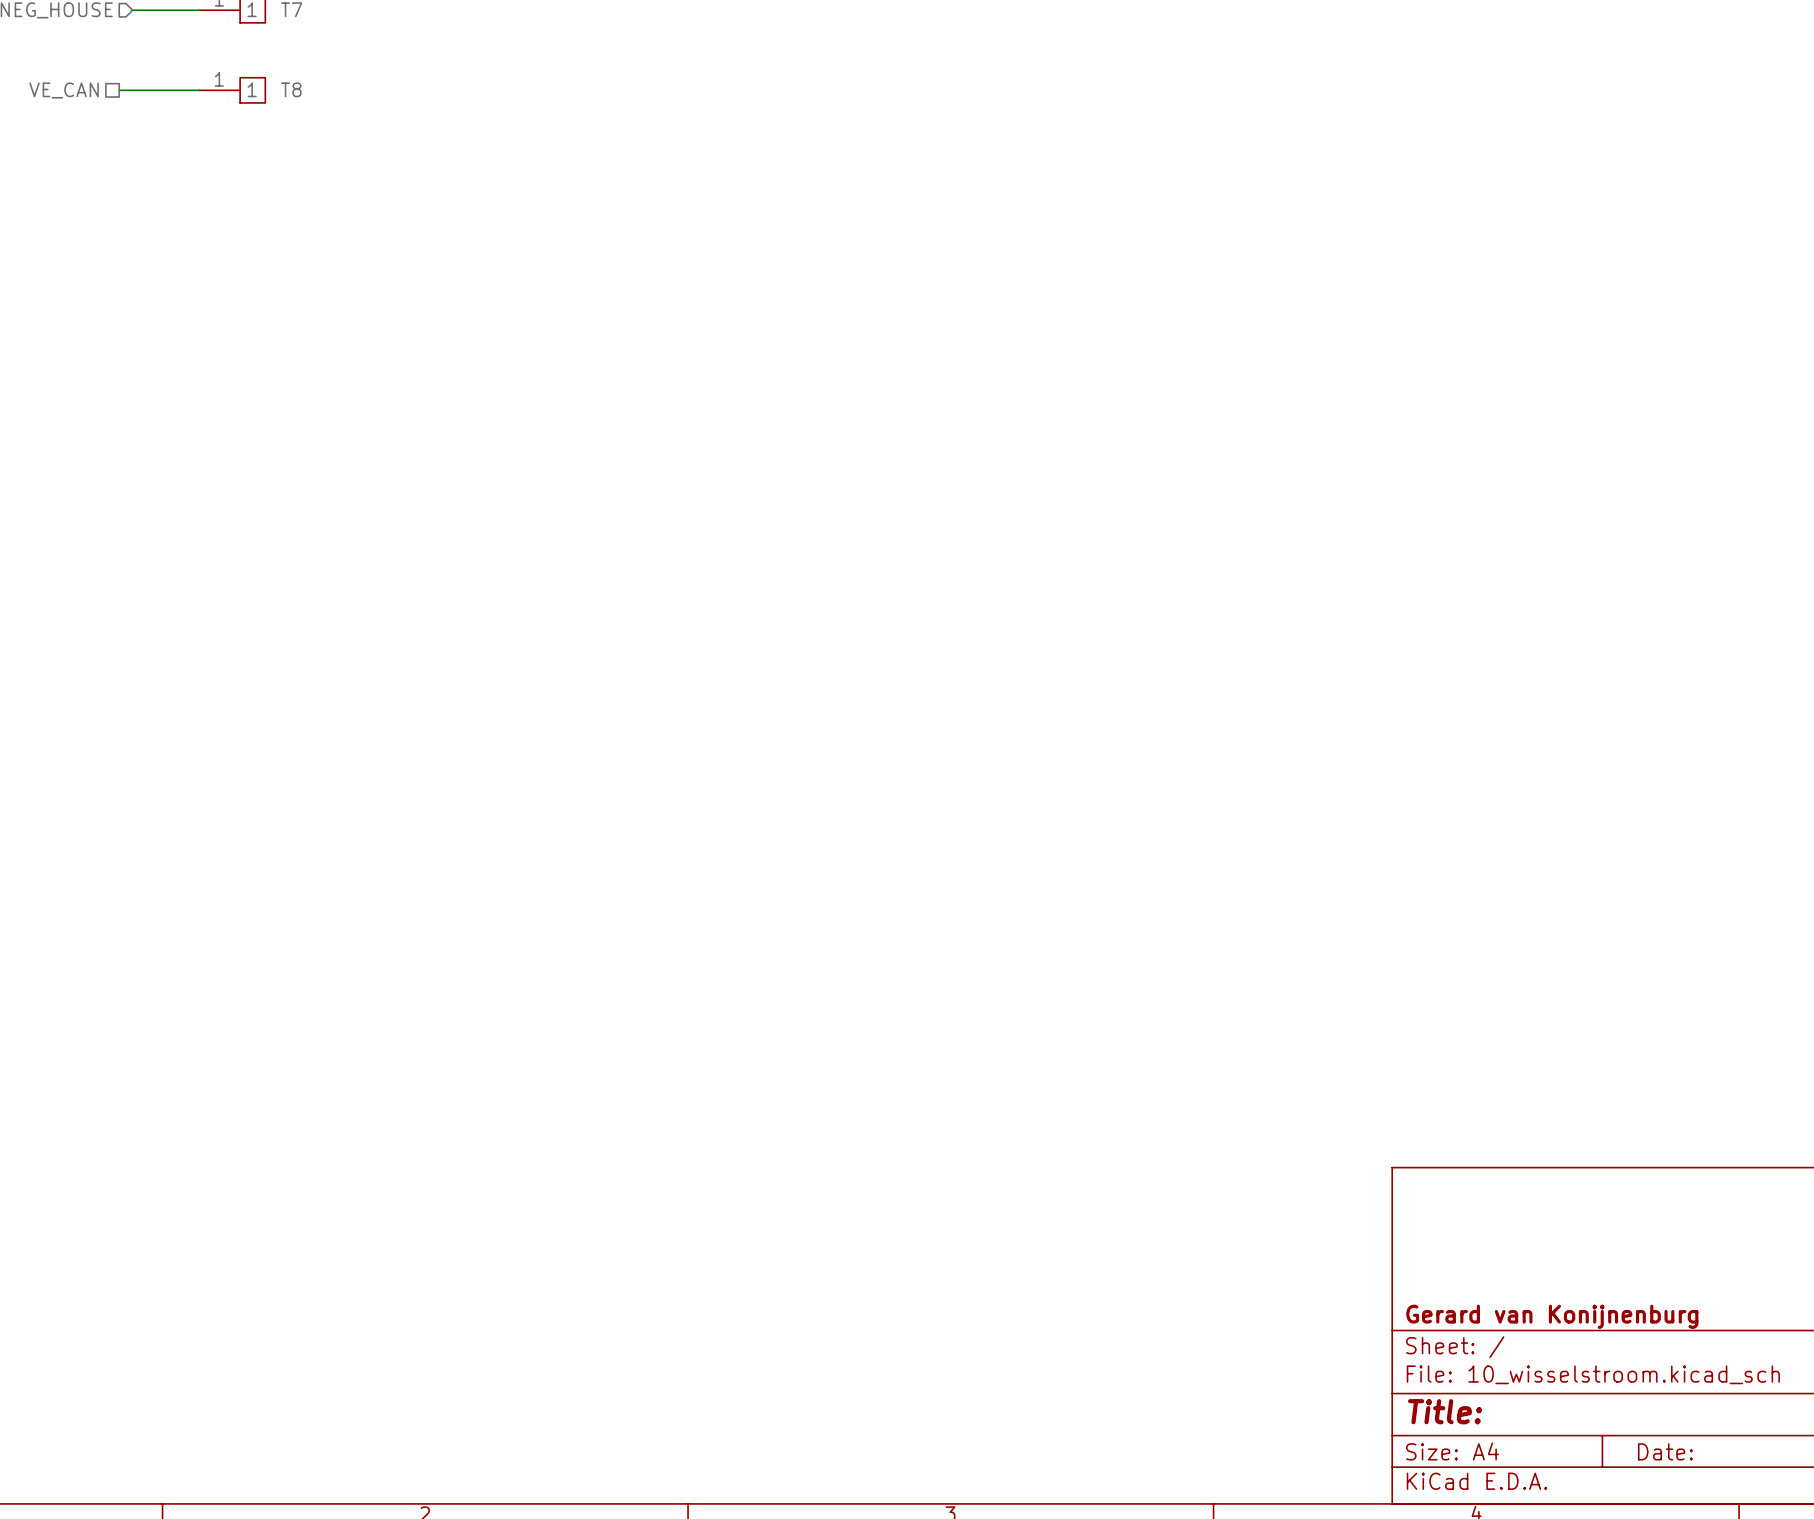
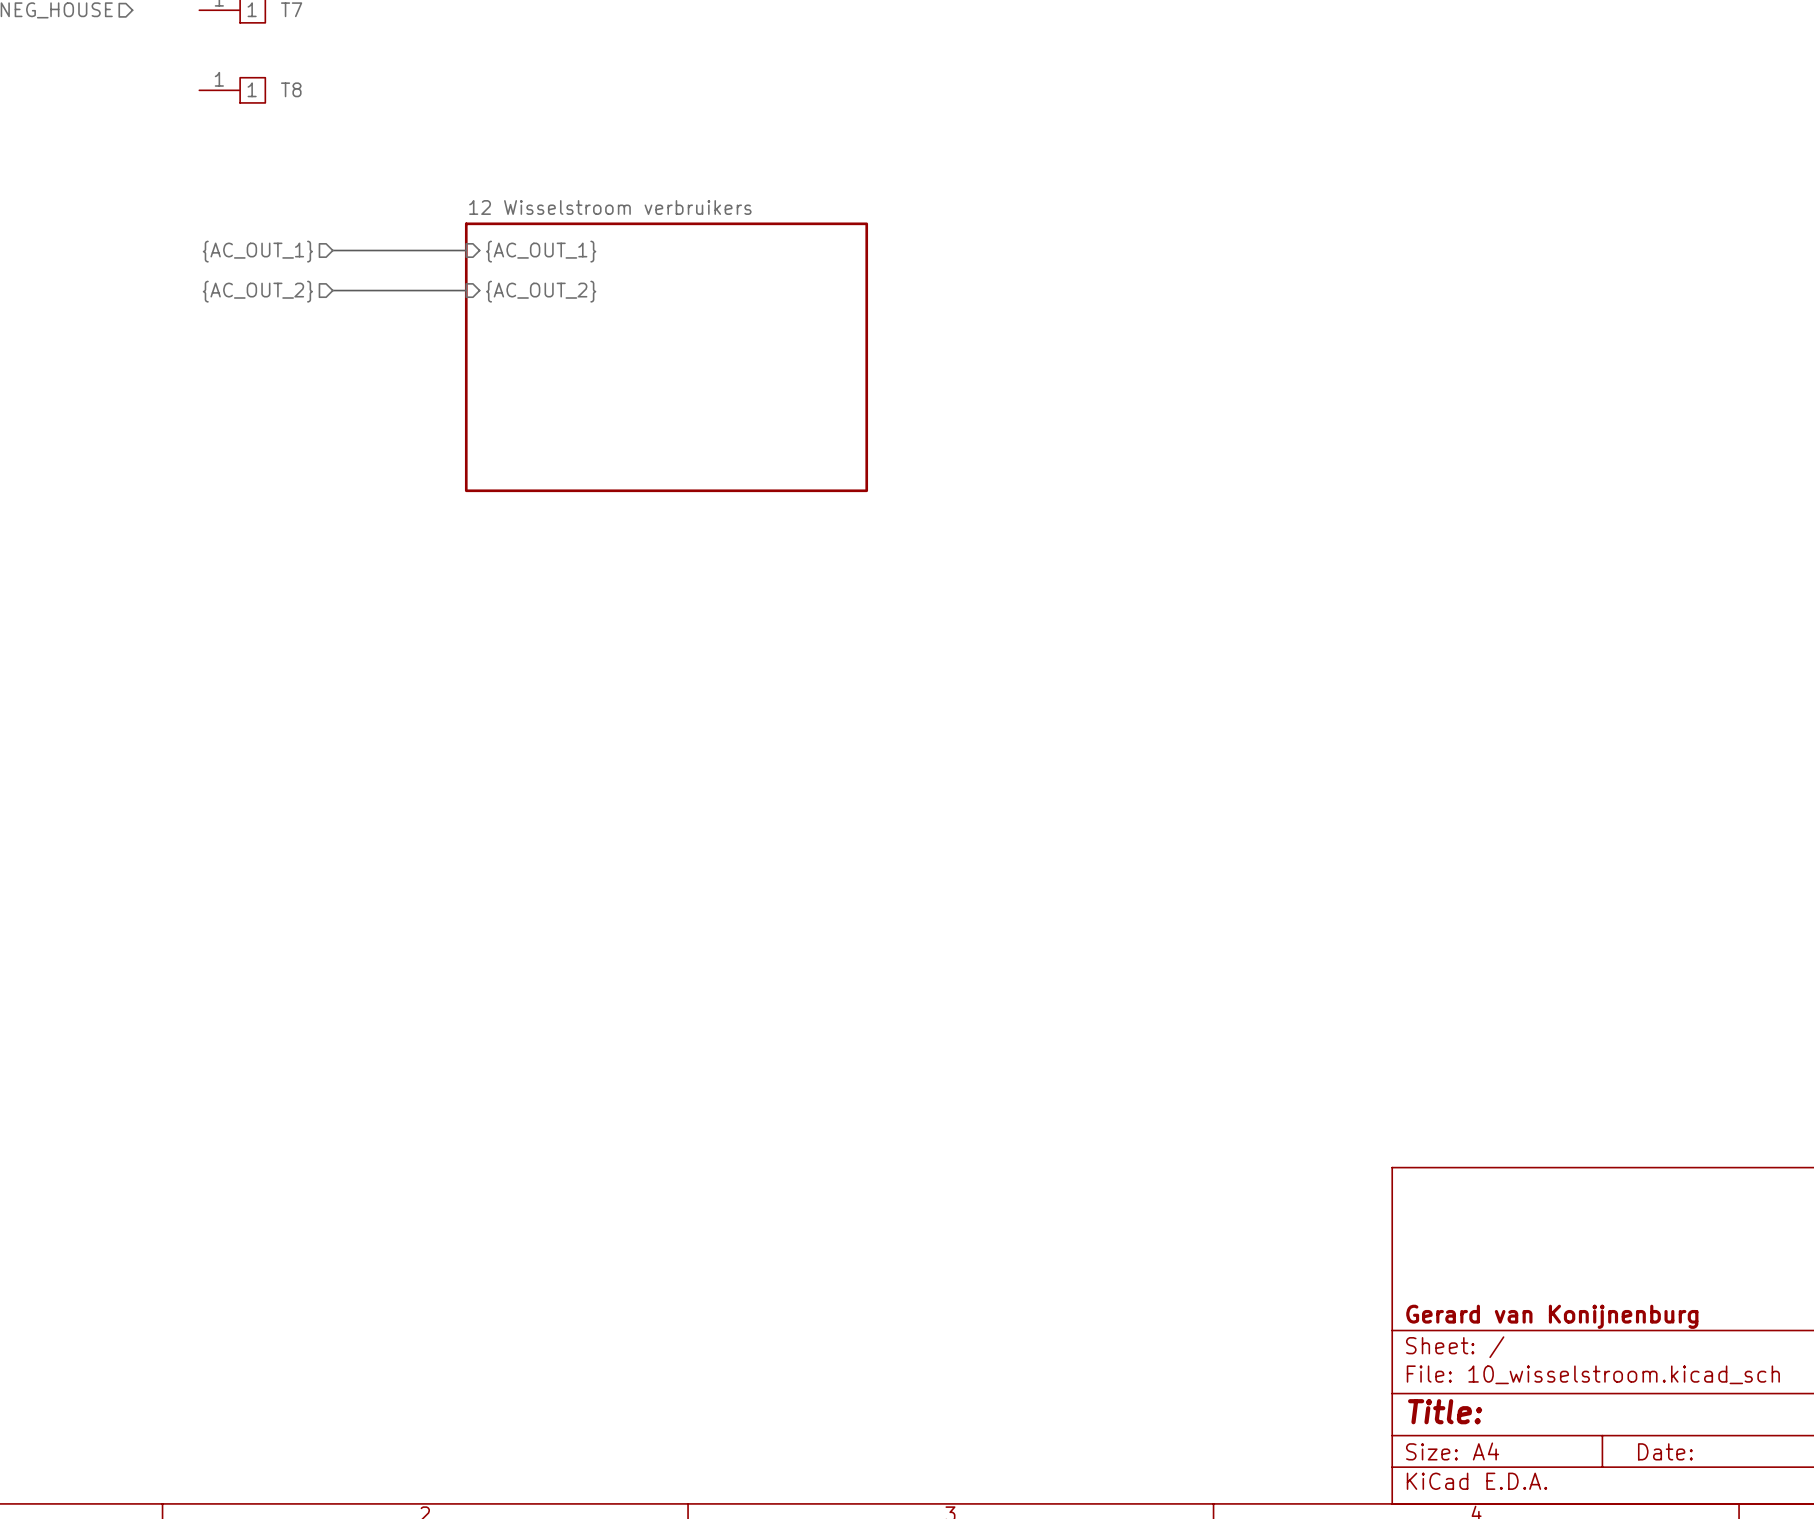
wire: (132, 10) (199, 10) -> none
hierarchical label: VE_CAN (64, 90) -> none
wire: (119, 90) (199, 90) -> none
bus: none -> (332, 250) (466, 250)
hierarchical label: none -> {AC_OUT_1} (257, 251)
sheet pin: none -> {AC_OUT_1} (541, 251)
bus: none -> (332, 290) (466, 290)
hierarchical label: none -> {AC_OUT_2} (257, 291)
sheet pin: none -> {AC_OUT_2} (541, 291)
sheet 12 Wisselstroom verbruikers: none -> (666, 357)

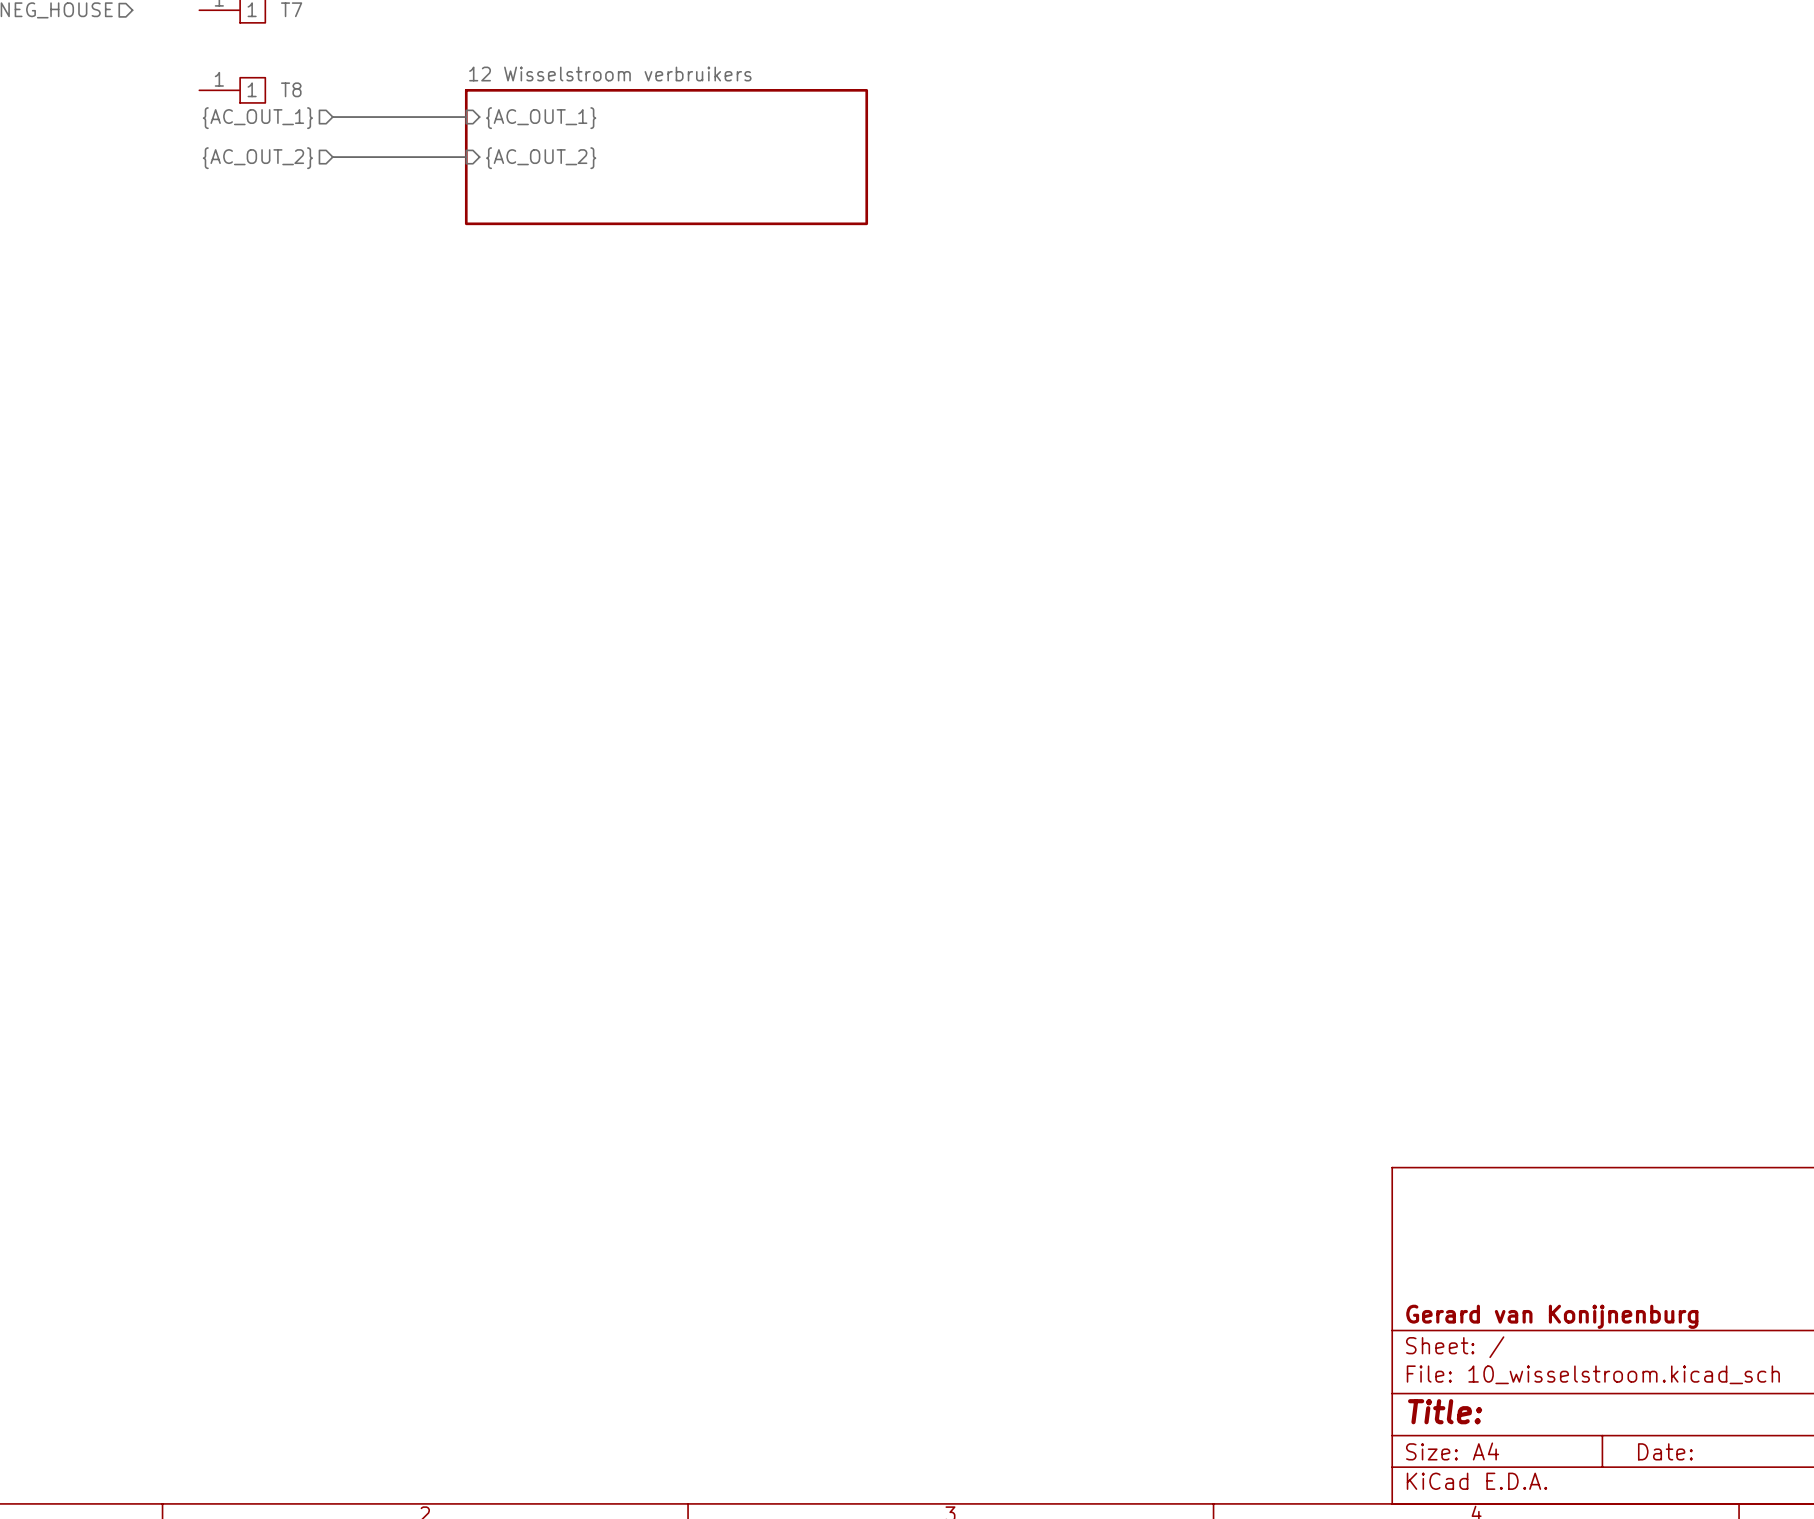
sheet 12 Wisselstroom verbruikers name position: 12 Wisselstroom verbruikers (610, 207) -> 12 Wisselstroom verbruikers (610, 74)
sheet 12 Wisselstroom verbruikers shape: [464, 222, 869, 493] -> [464, 89, 869, 226]
bus: (332, 250) (466, 250) -> (332, 117) (466, 117)
hierarchical label position: {AC_OUT_1} (257, 251) -> {AC_OUT_1} (257, 118)
sheet pin position: {AC_OUT_1} (541, 251) -> {AC_OUT_1} (541, 118)
bus: (332, 290) (466, 290) -> (332, 157) (466, 157)
hierarchical label position: {AC_OUT_2} (257, 291) -> {AC_OUT_2} (257, 158)
sheet pin position: {AC_OUT_2} (541, 291) -> {AC_OUT_2} (541, 158)

